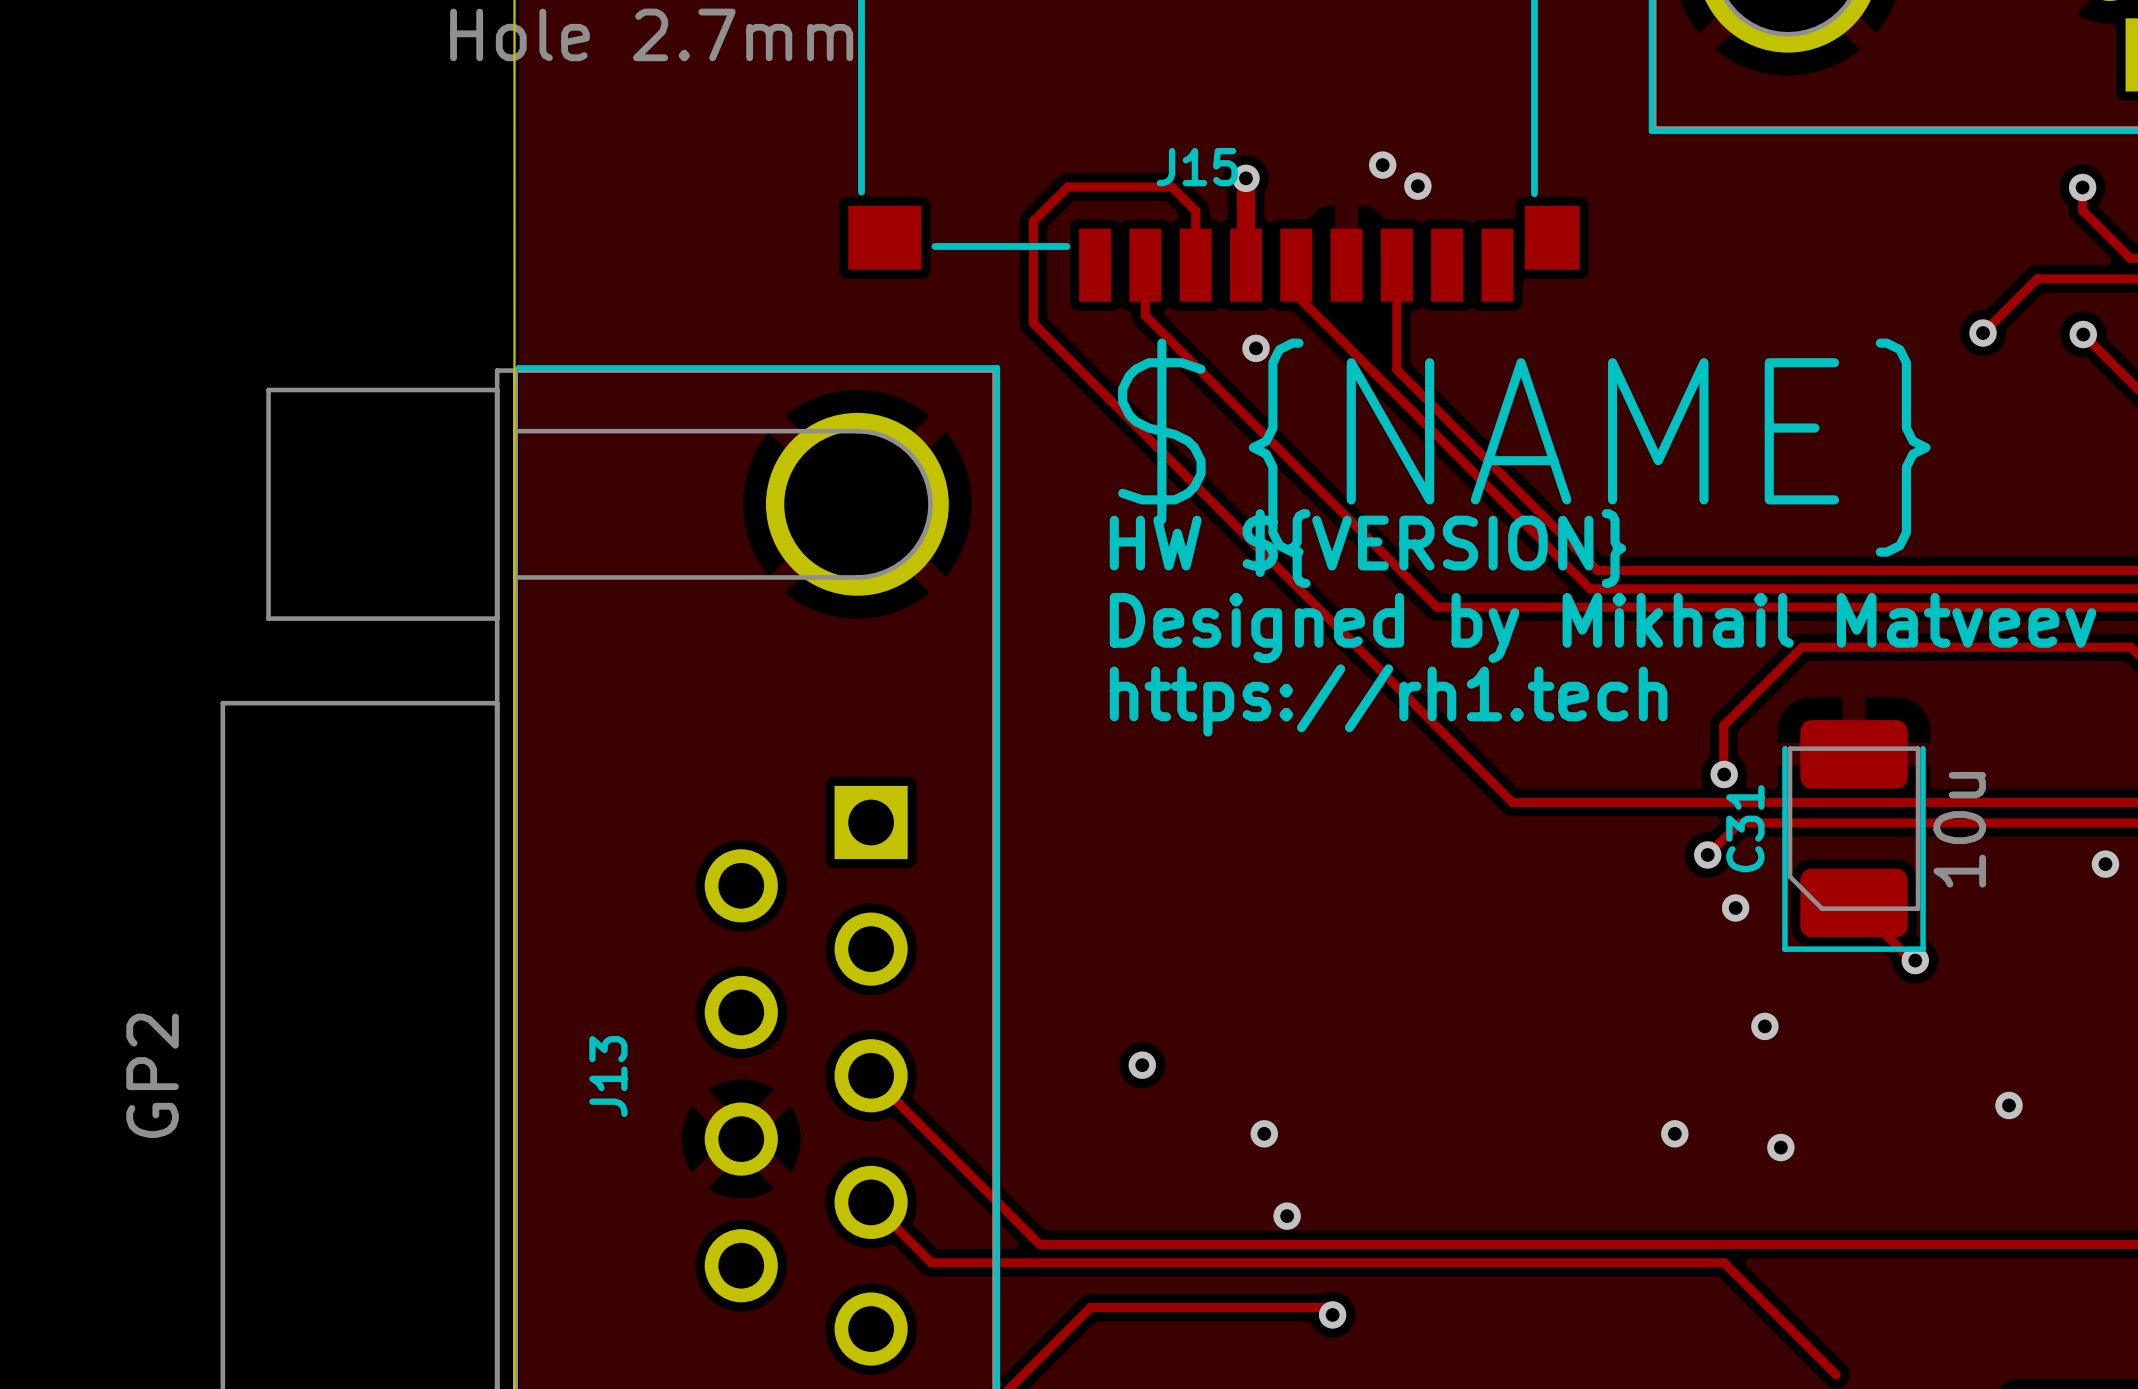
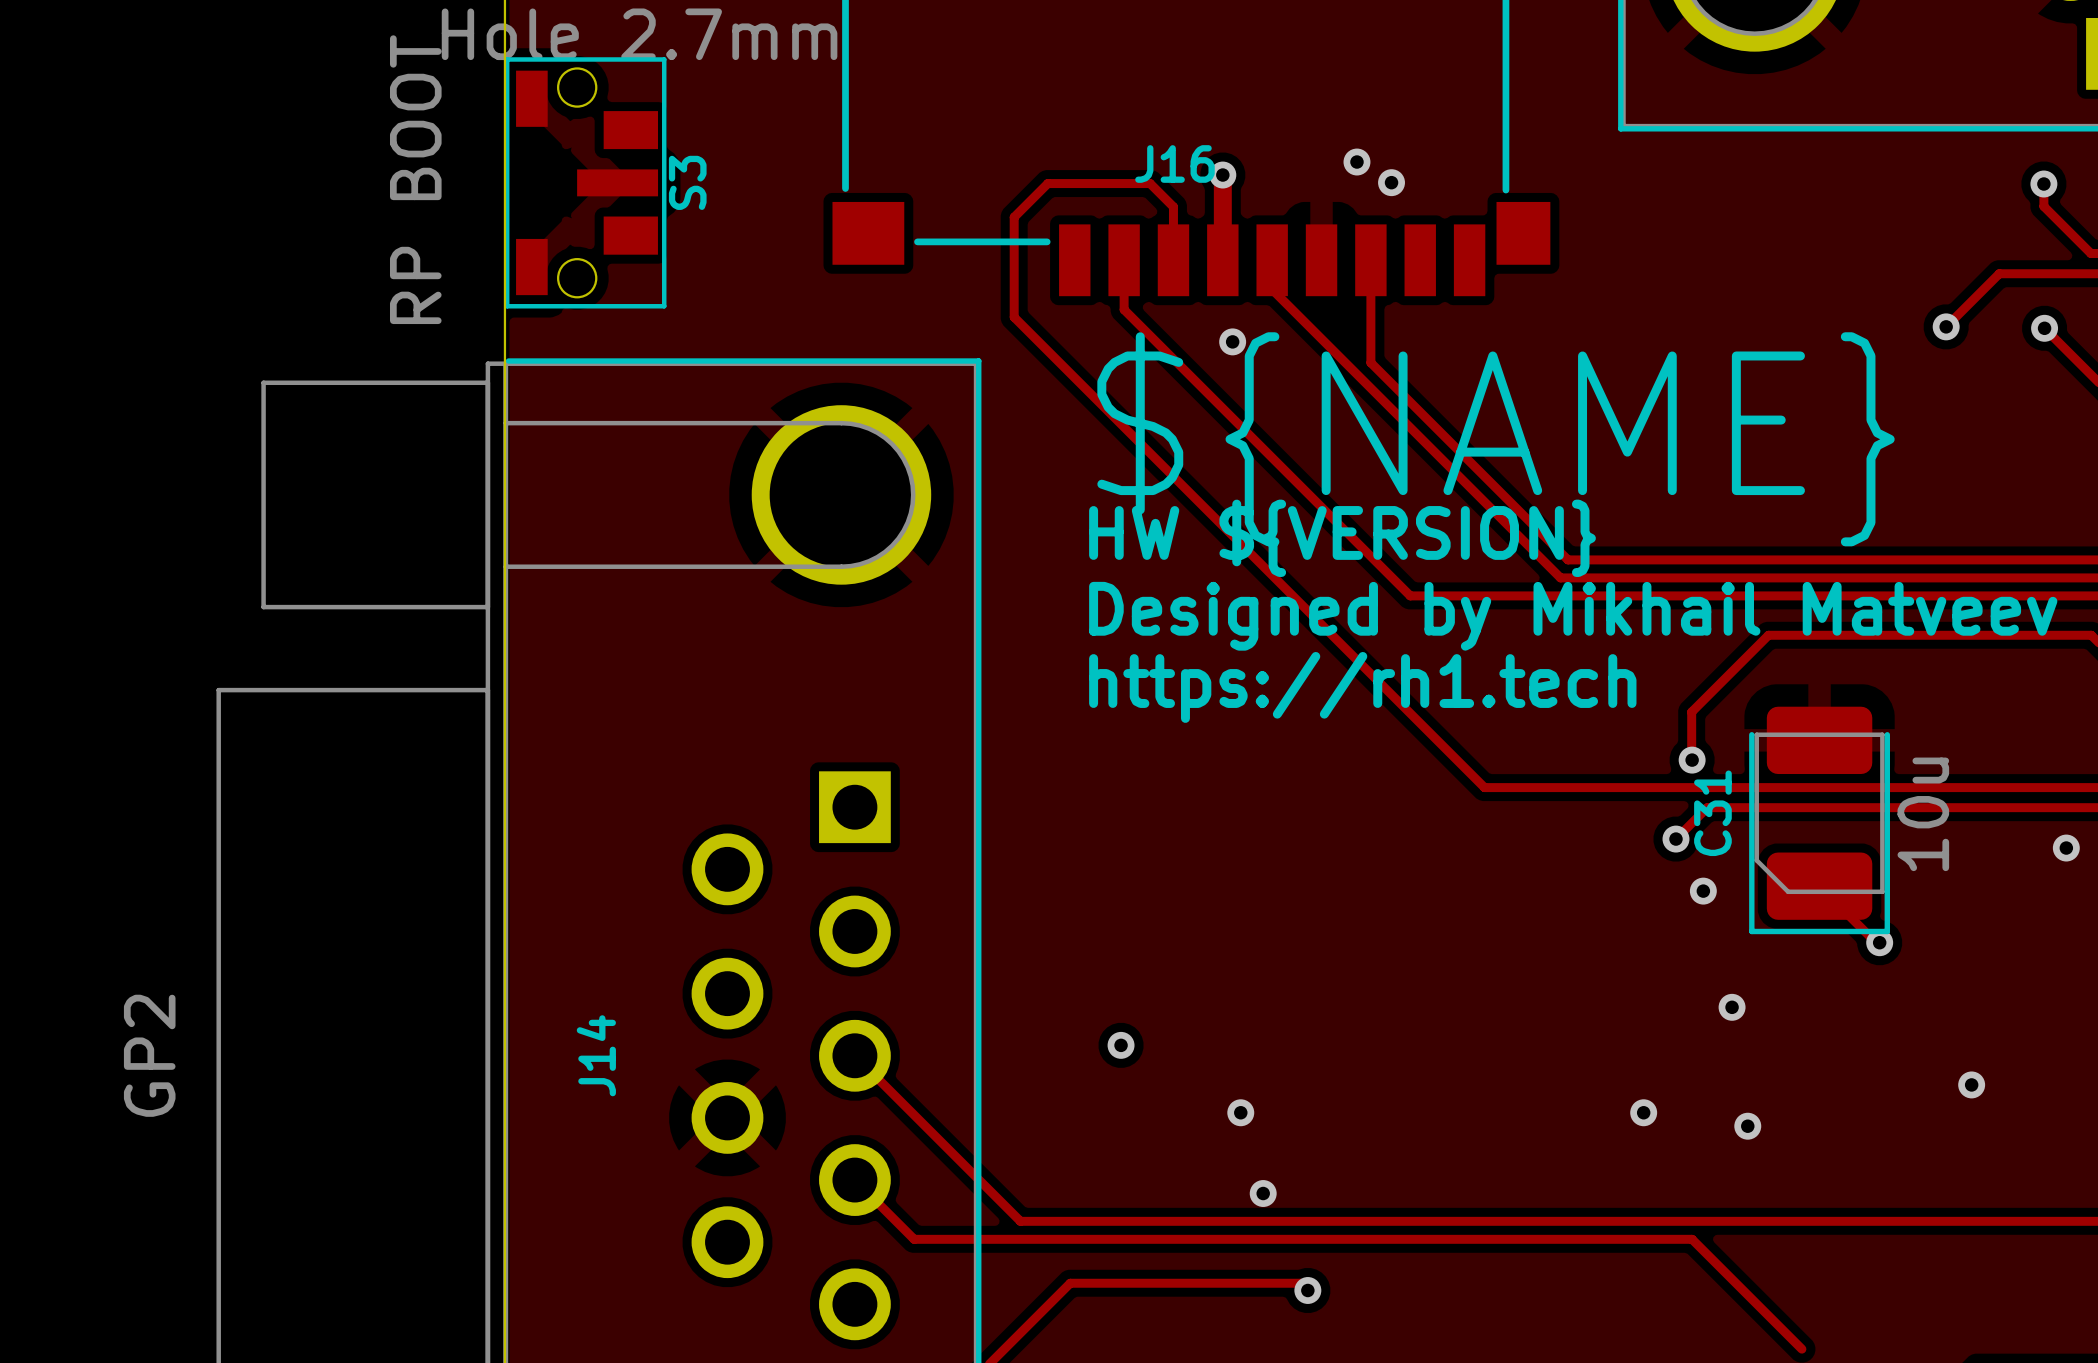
J15 name: J15 (1197, 167) -> J16 (1174, 163)
S3: none -> RP BOOT (585, 182)
J13 name: J13 (608, 1076) -> J14 (596, 1055)

